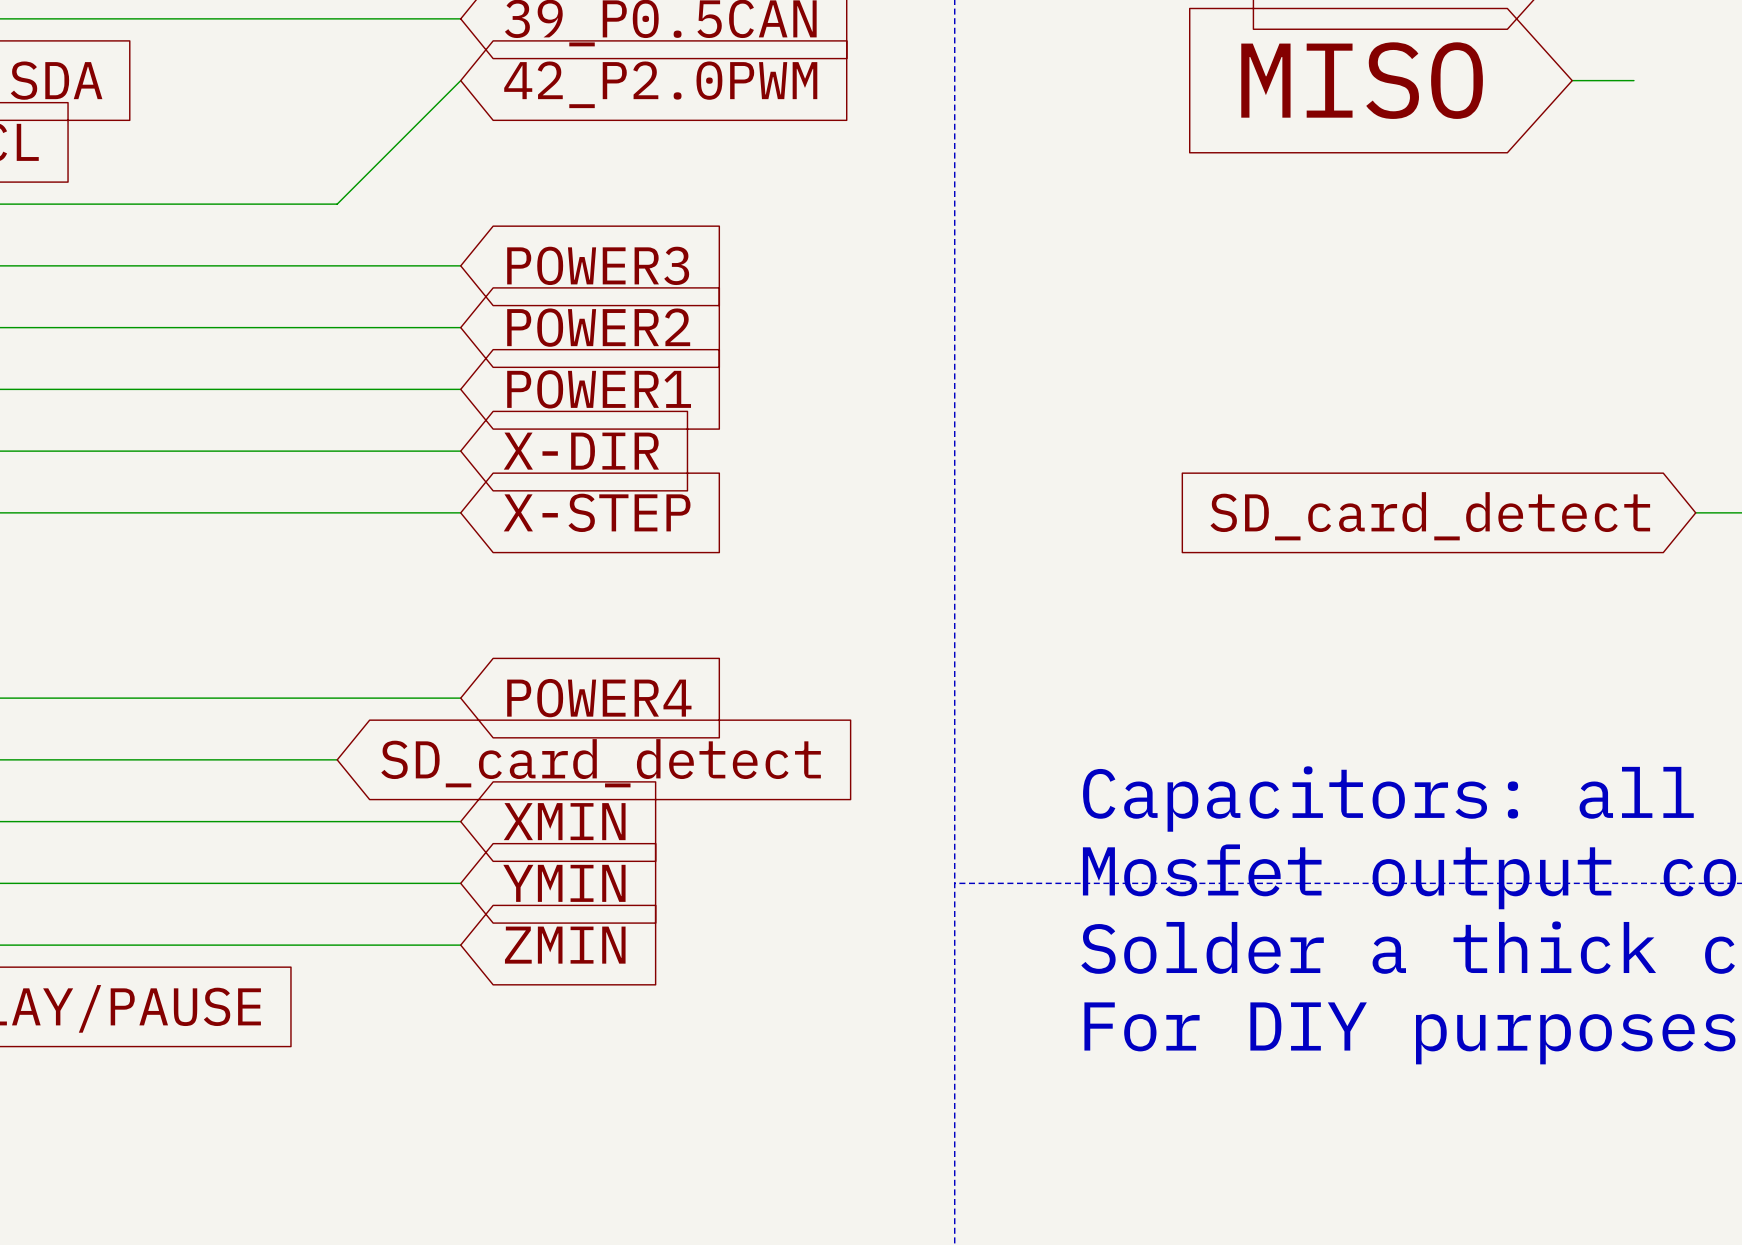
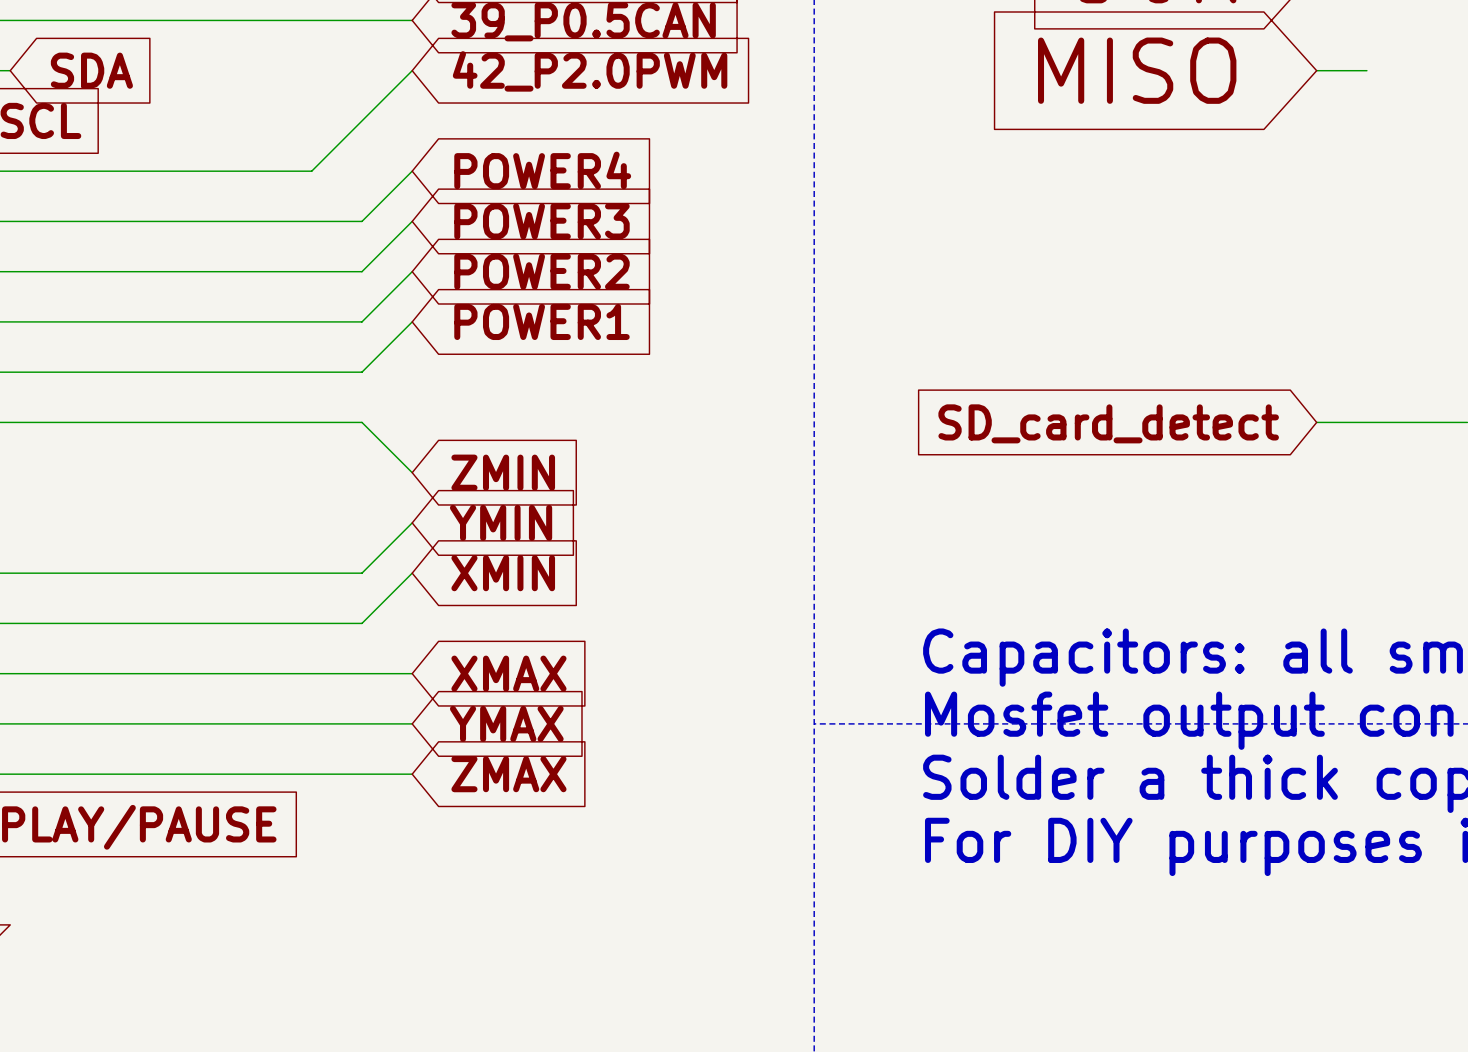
wire: none -> (412, 171) (361, 221)
global label: none -> POWER4 (542, 170)
wire: (398, 265) (460, 265) -> (361, 271) (412, 221)
wire: (398, 327) (460, 327) -> (361, 321) (412, 271)
wire: (398, 389) (460, 389) -> (361, 372) (412, 321)
wire: (398, 451) (460, 451) -> none
global label: X-DIR (581, 451) -> none
wire: (398, 512) (460, 512) -> (361, 422) (412, 472)
global label: X-STEP (597, 512) -> none
wire: none -> (1316, 422) (1417, 422)
global label position: SD_card_detect (1430, 516) -> SD_card_detect (1108, 423)
global label: none -> ZMIN (503, 472)
global label: none -> YMIN (501, 522)
wire: (398, 698) (460, 698) -> (361, 573) (412, 522)
wire: none -> (412, 573) (361, 623) (311, 623)
global label: POWER4 (599, 698) -> XMIN (503, 573)
global label: SD_card_detect (601, 763) -> none
global label: XMIN (564, 821) -> XMAX (508, 673)
global label: YMIN (564, 883) -> YMAX (506, 723)
global label: ZMIN (565, 945) -> ZMAX (508, 774)

